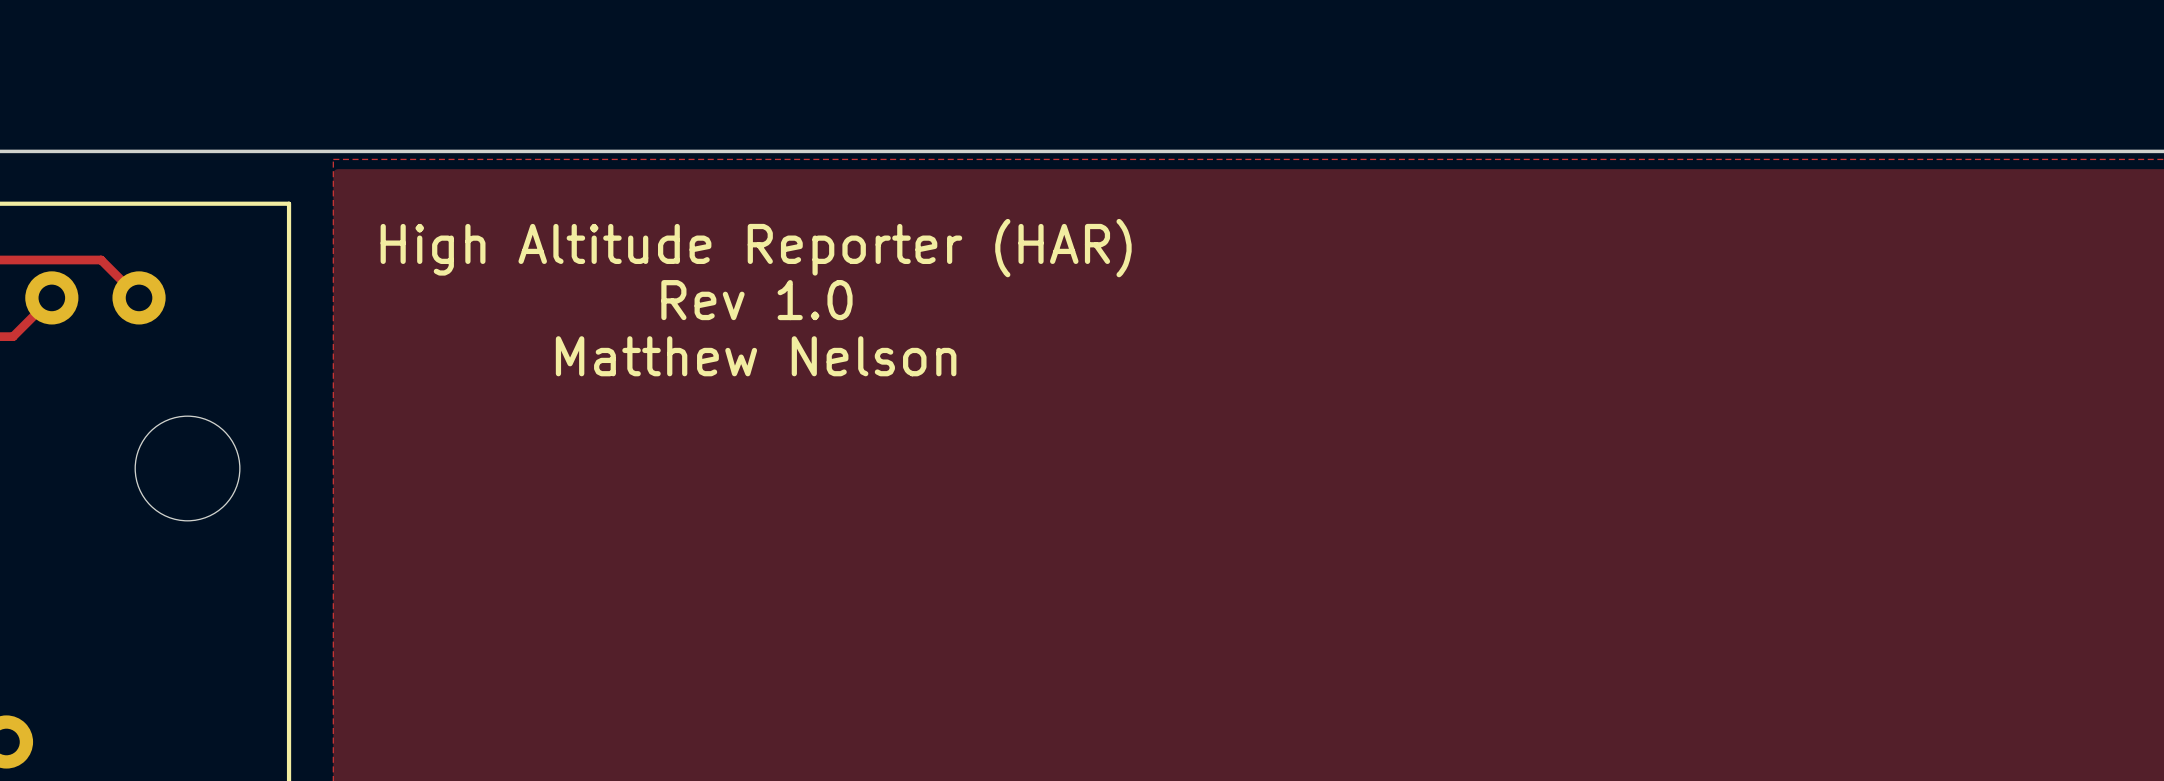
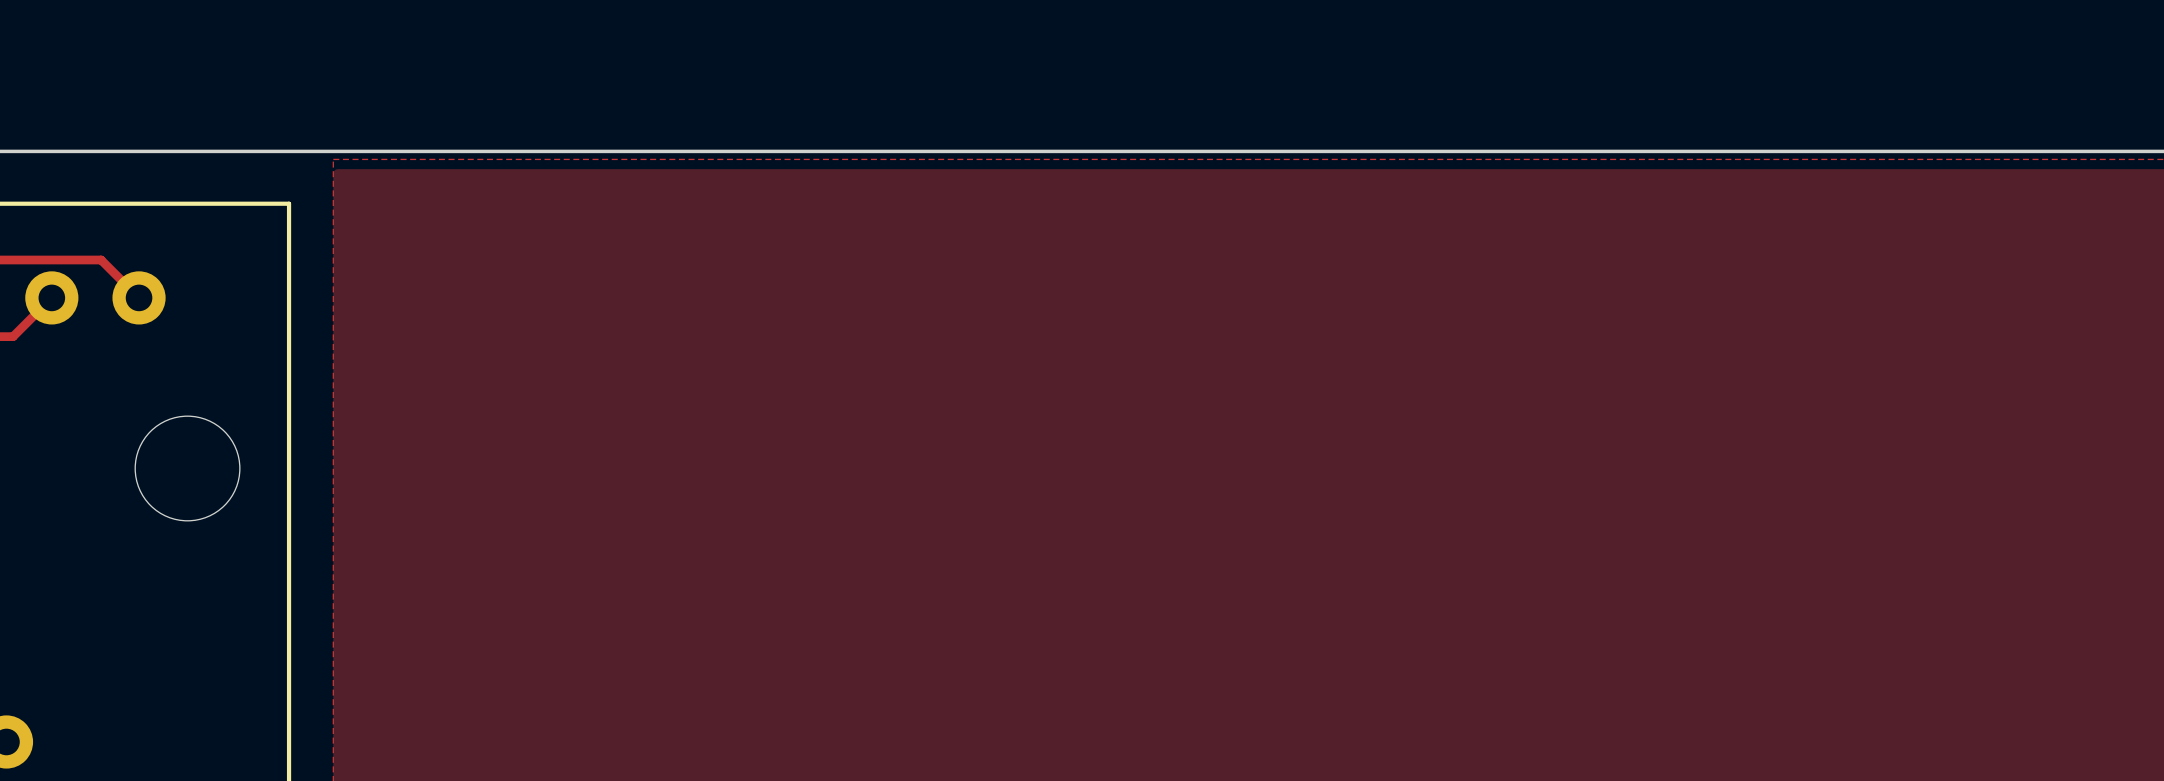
text: High Altitude Reporter (HAR) (756, 248) -> none
text: Rev 1.0 (756, 300) -> none
text: Matthew Nelson (756, 356) -> none

